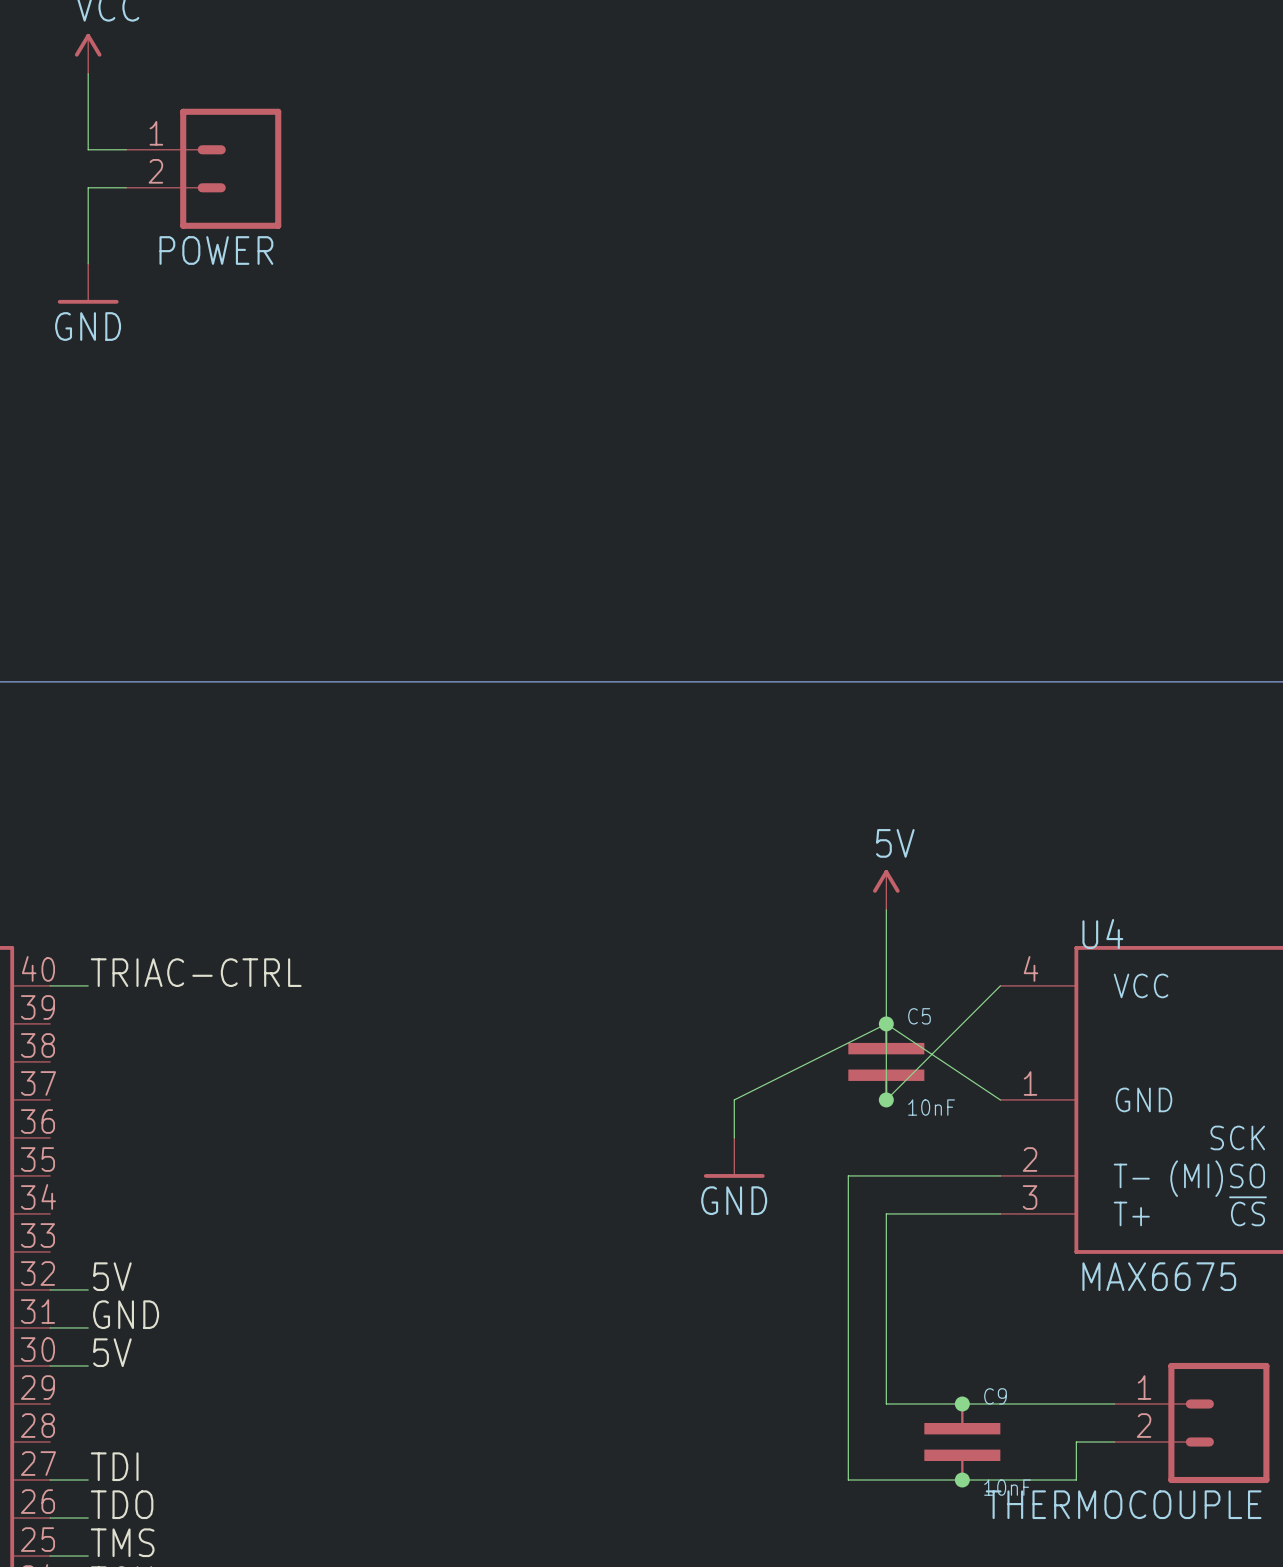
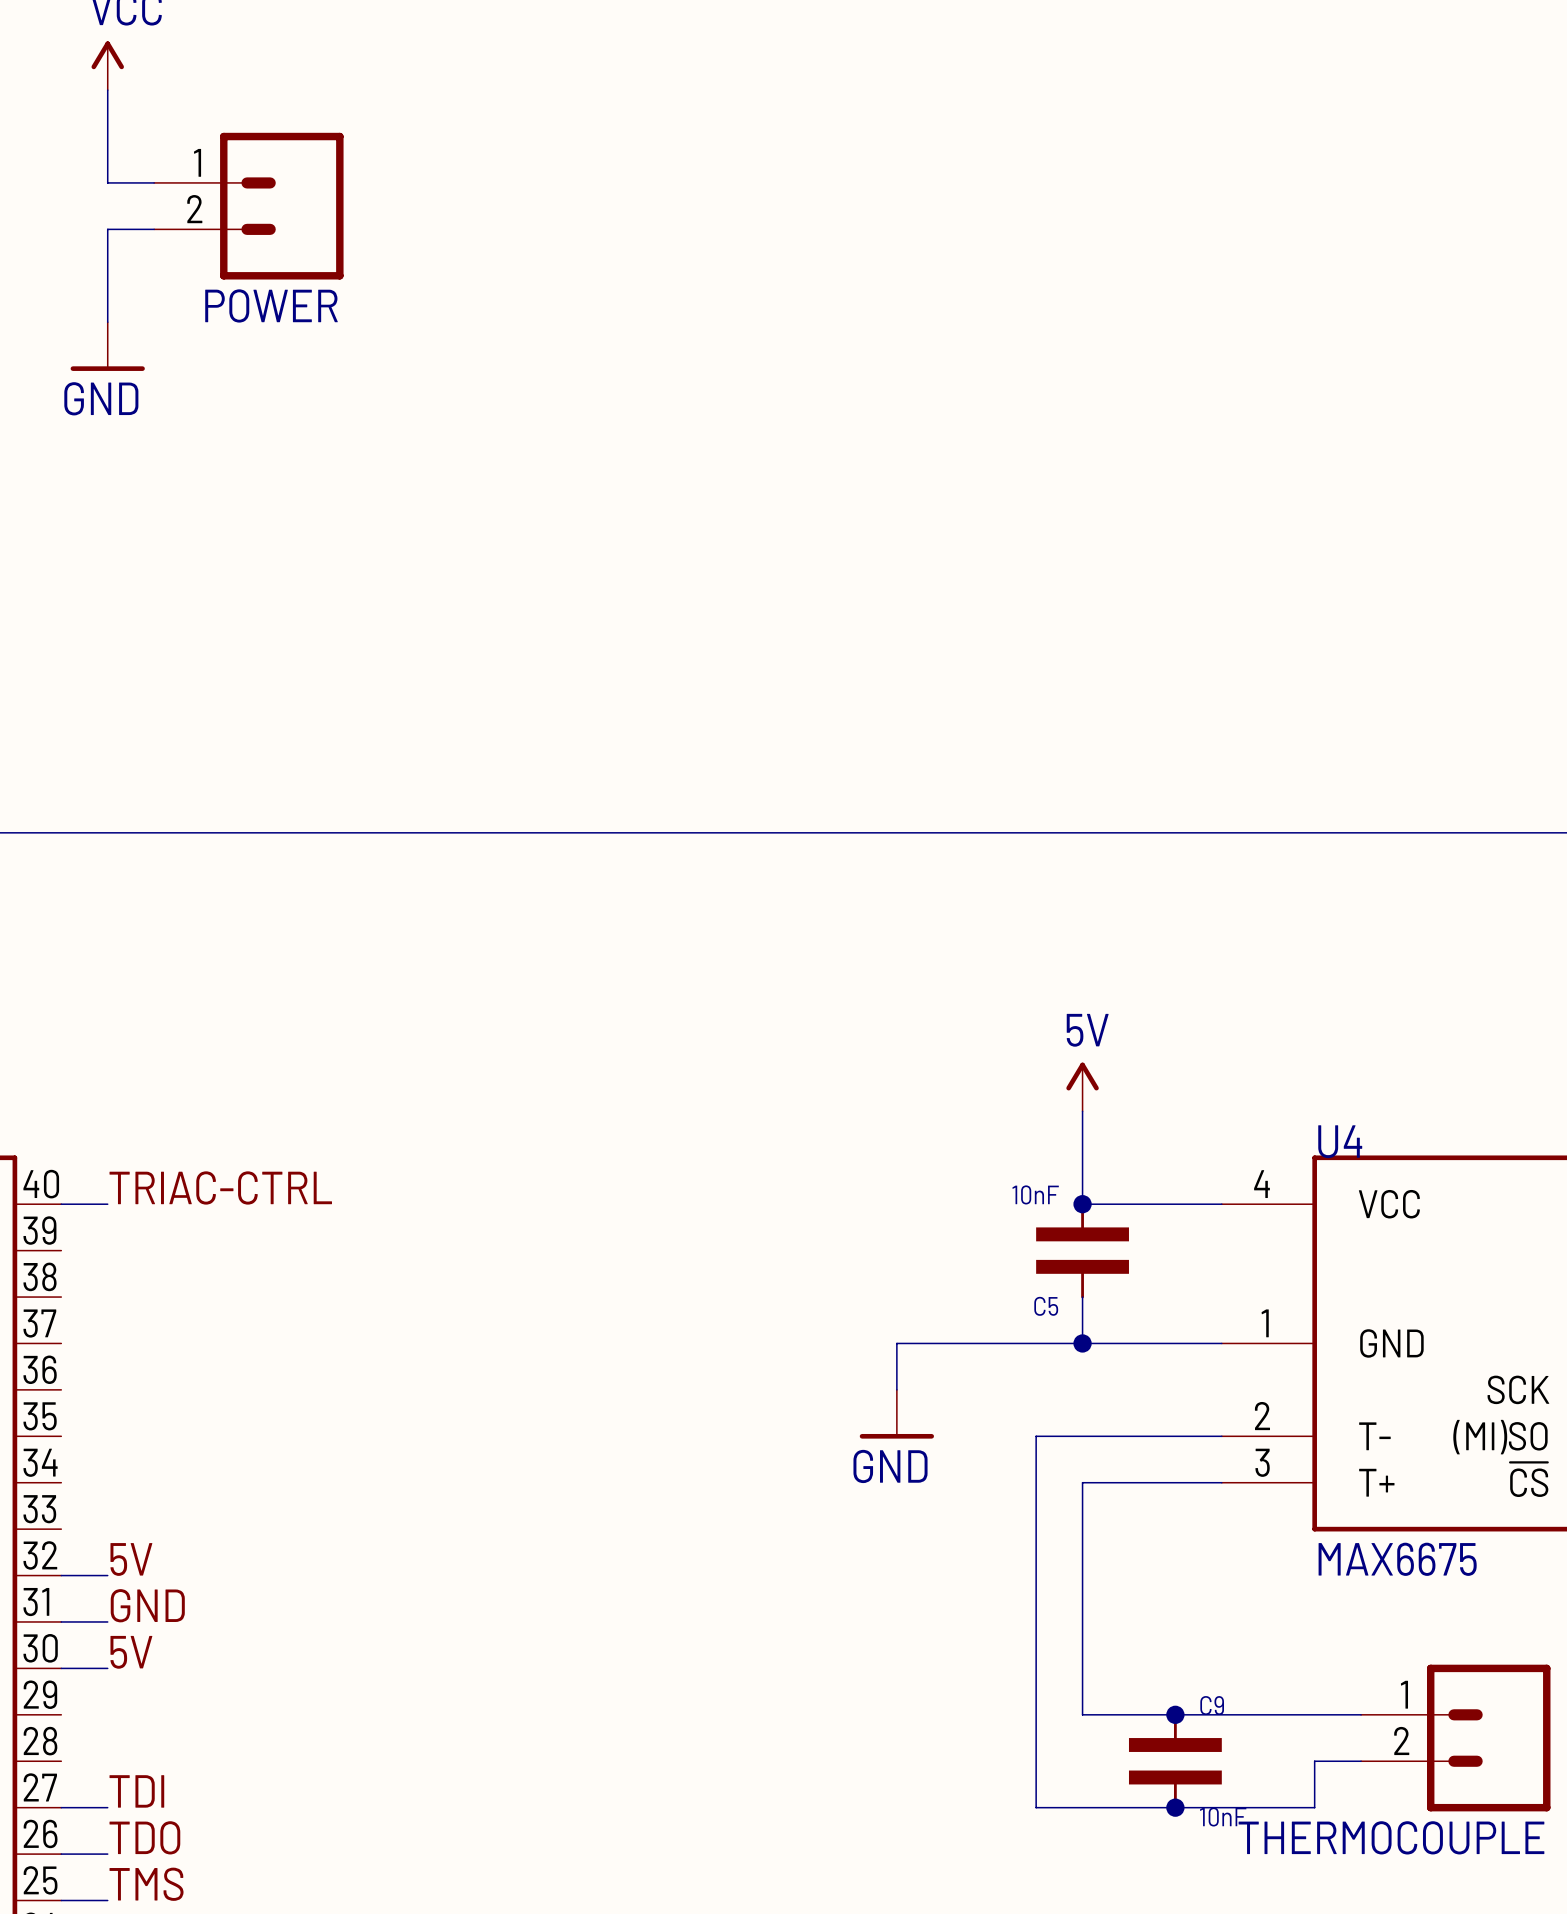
wire: (1000, 985) (886, 1099) -> (1221, 1204) (1082, 1204)
C5 name position: C5 (919, 1016) -> C5 (1046, 1306)
junction position: (886, 1023) -> (1082, 1204)
C5 position: (886, 1061) -> (1082, 1250)
wire: (734, 1099) (886, 1023) (1000, 1099) -> (896, 1343) (1221, 1343)
C5 value position: 10nF (931, 1107) -> 10nF (1035, 1194)

